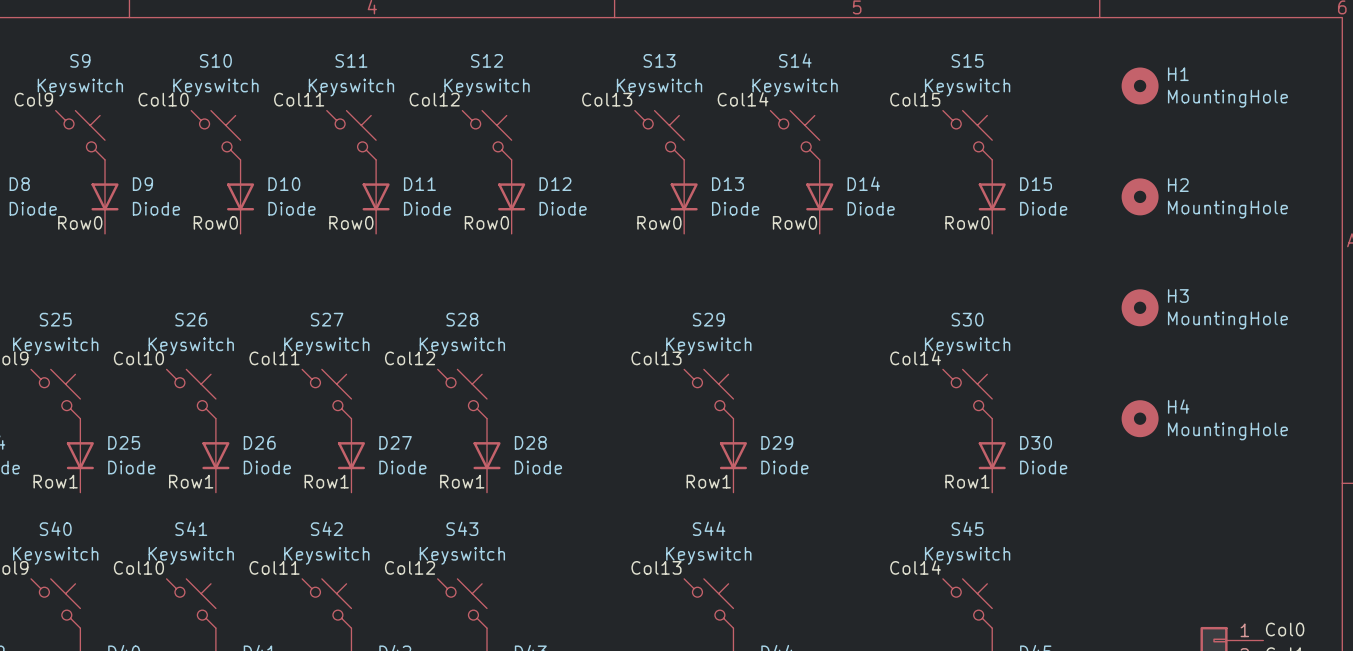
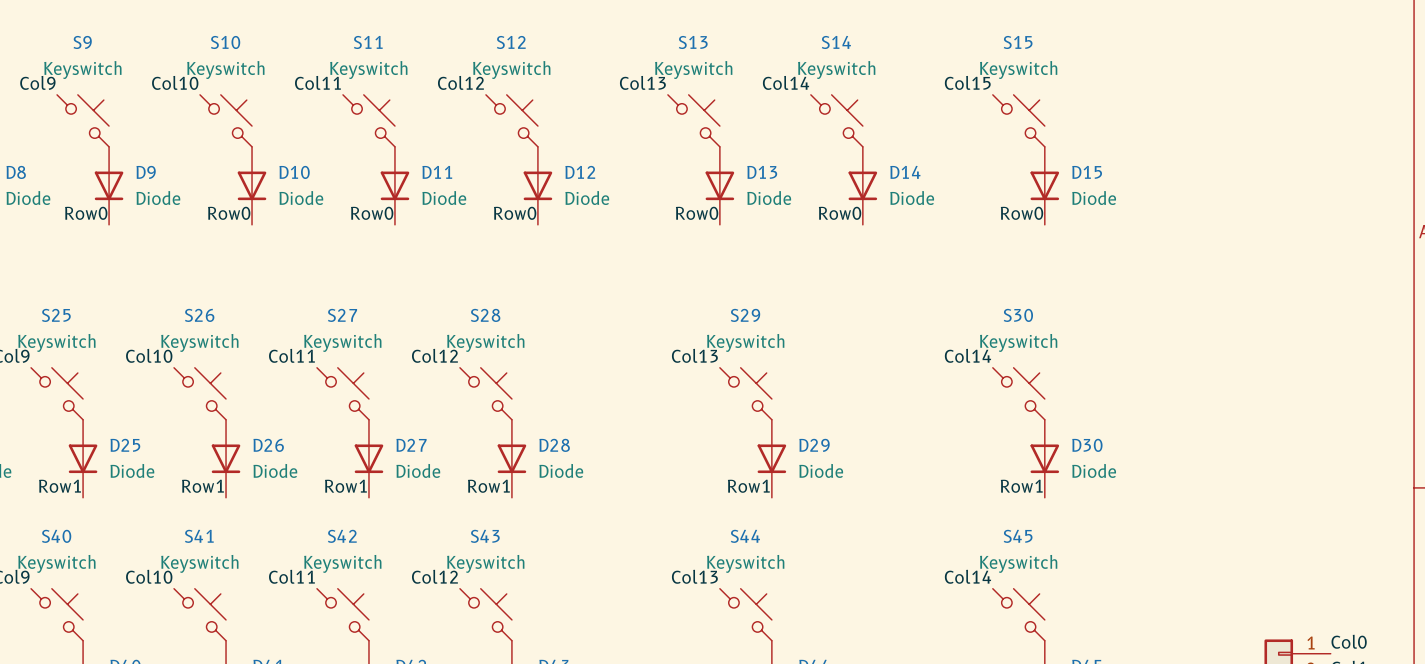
H1: MountingHole (1140, 85) -> none
H2: MountingHole (1140, 196) -> none
H3: MountingHole (1140, 307) -> none
H4: MountingHole (1140, 418) -> none

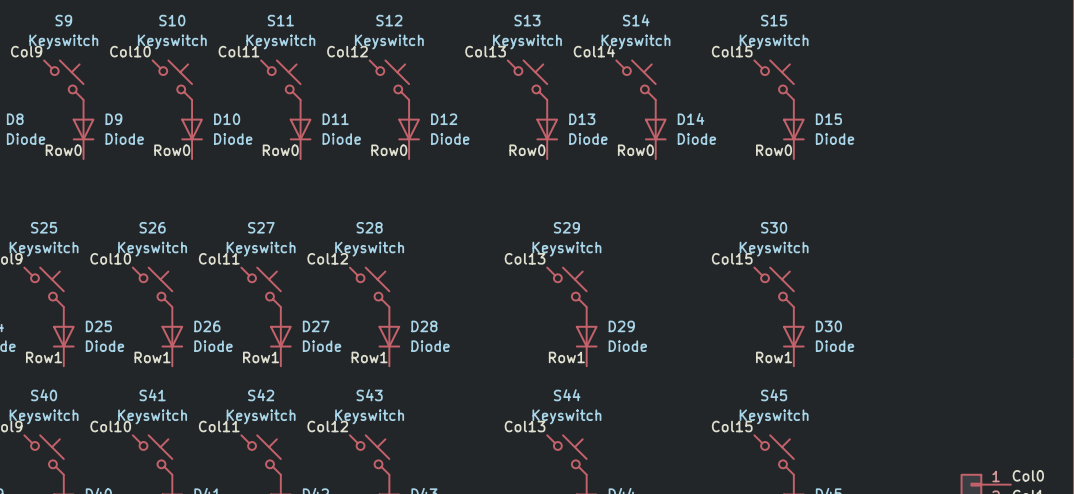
label: Col14 (967, 355) -> Col15 (732, 258)
label: Col14 (967, 576) -> Col15 (732, 426)

